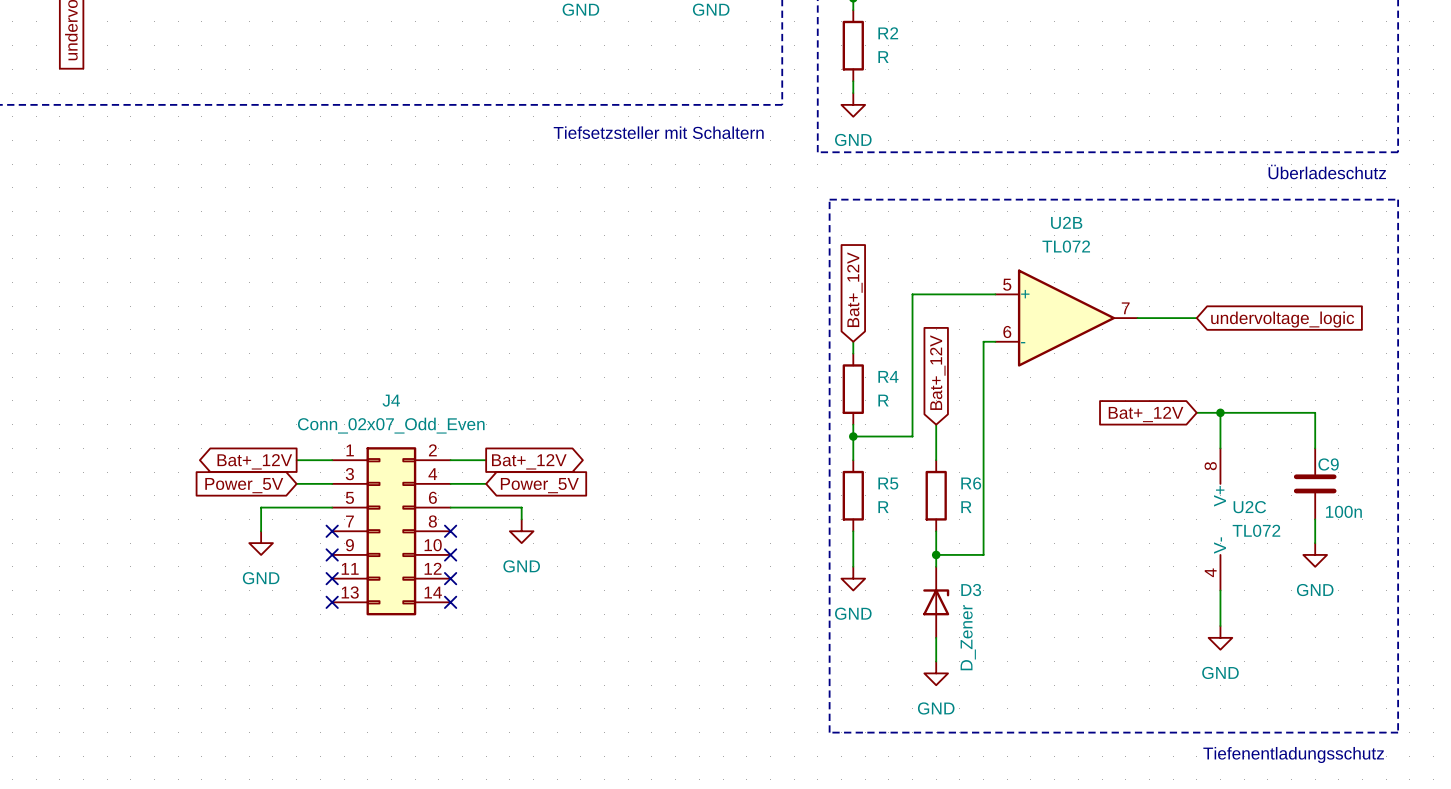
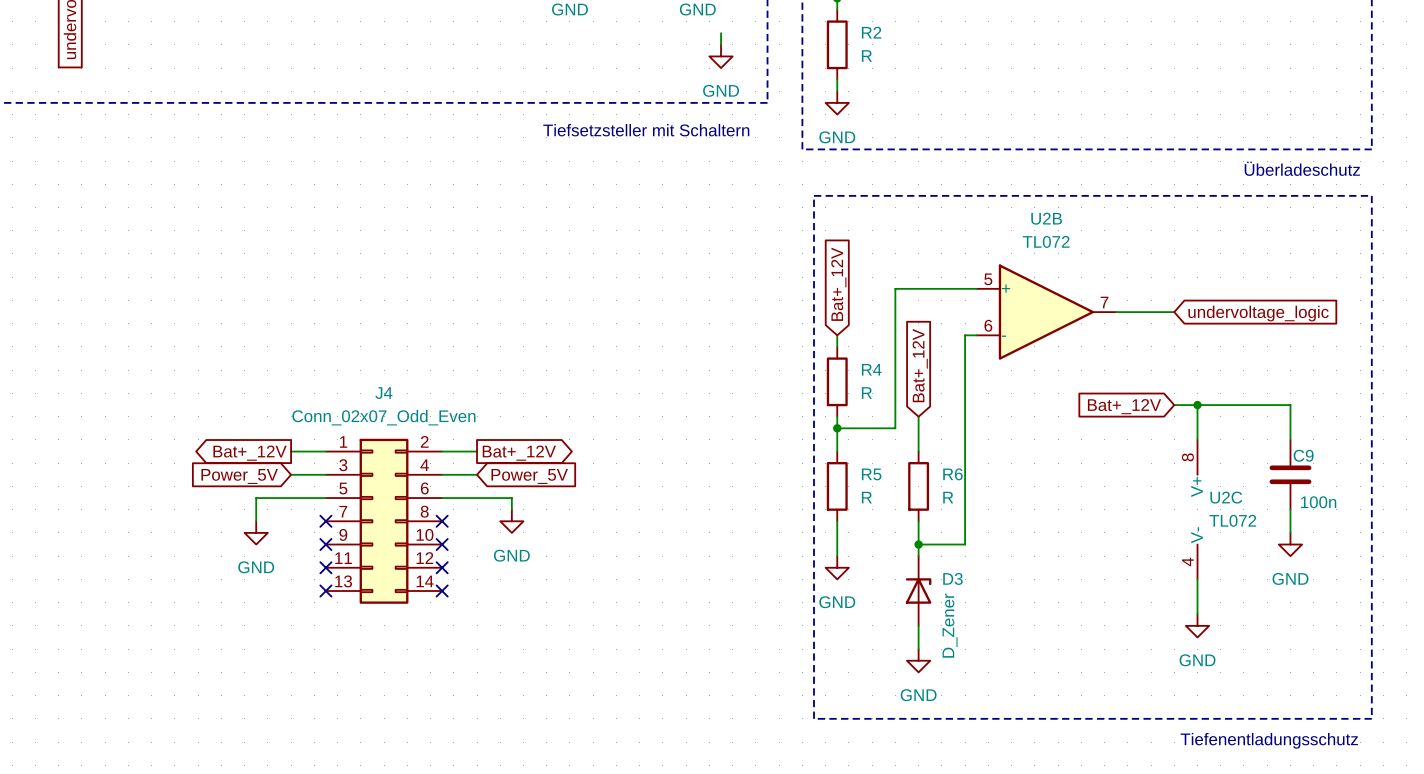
wire: none -> (721, 33) (721, 44)
power symbol: none -> GND (721, 56)

